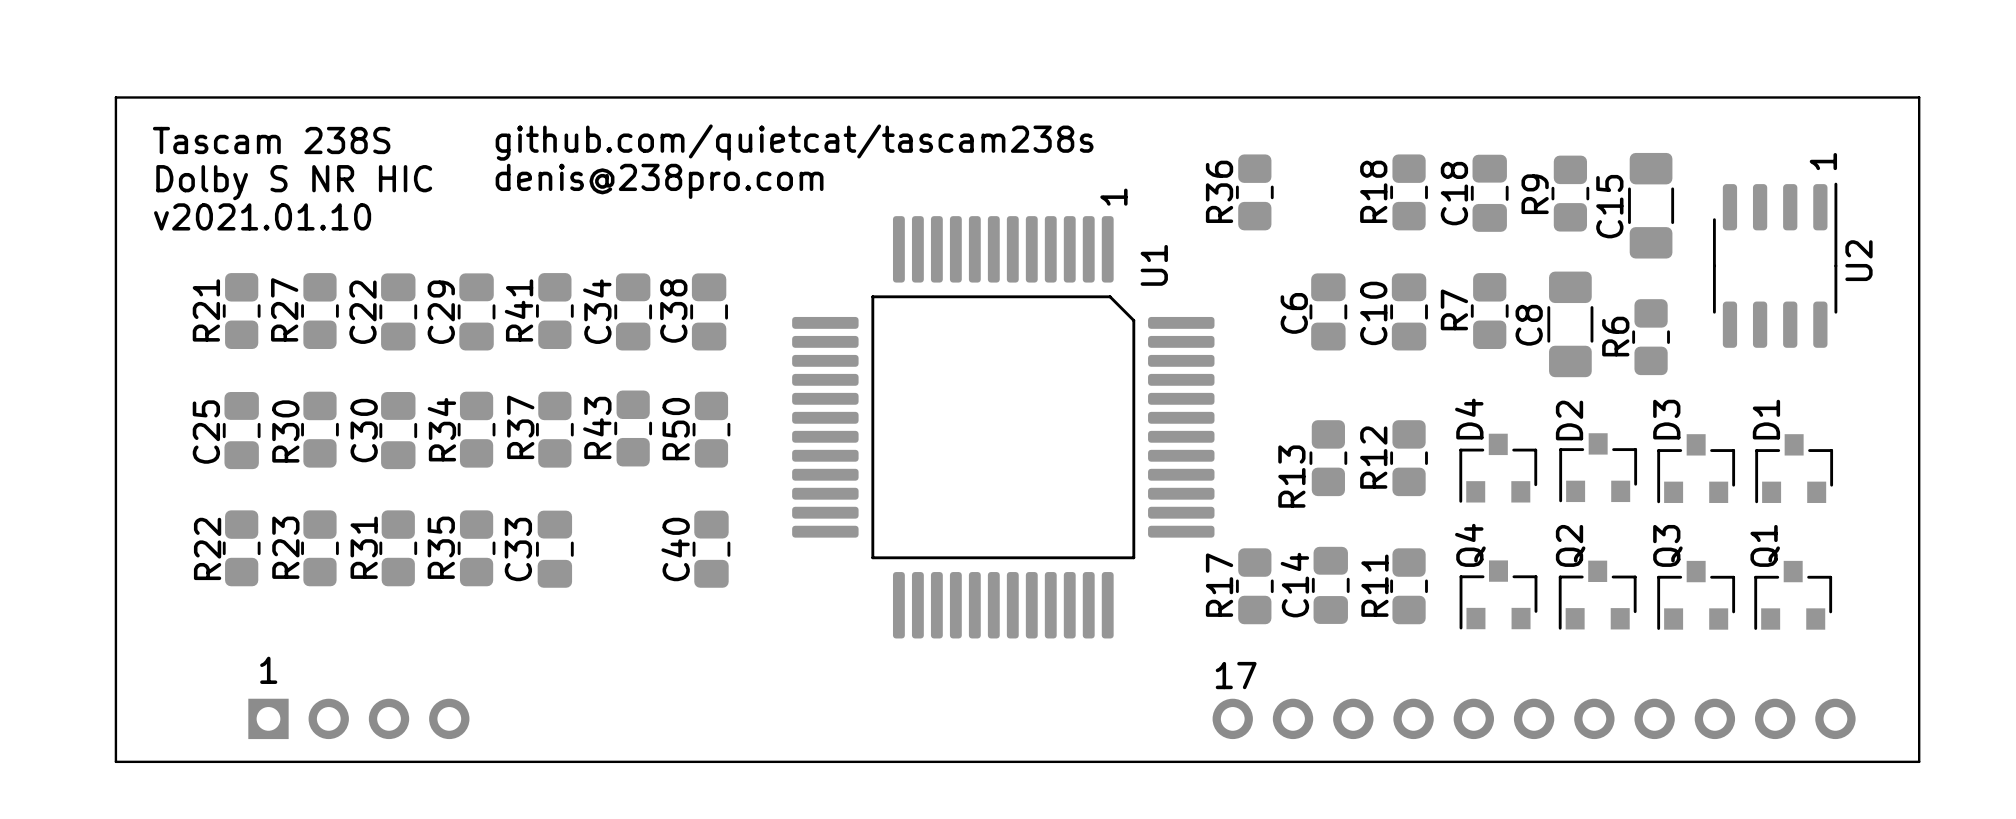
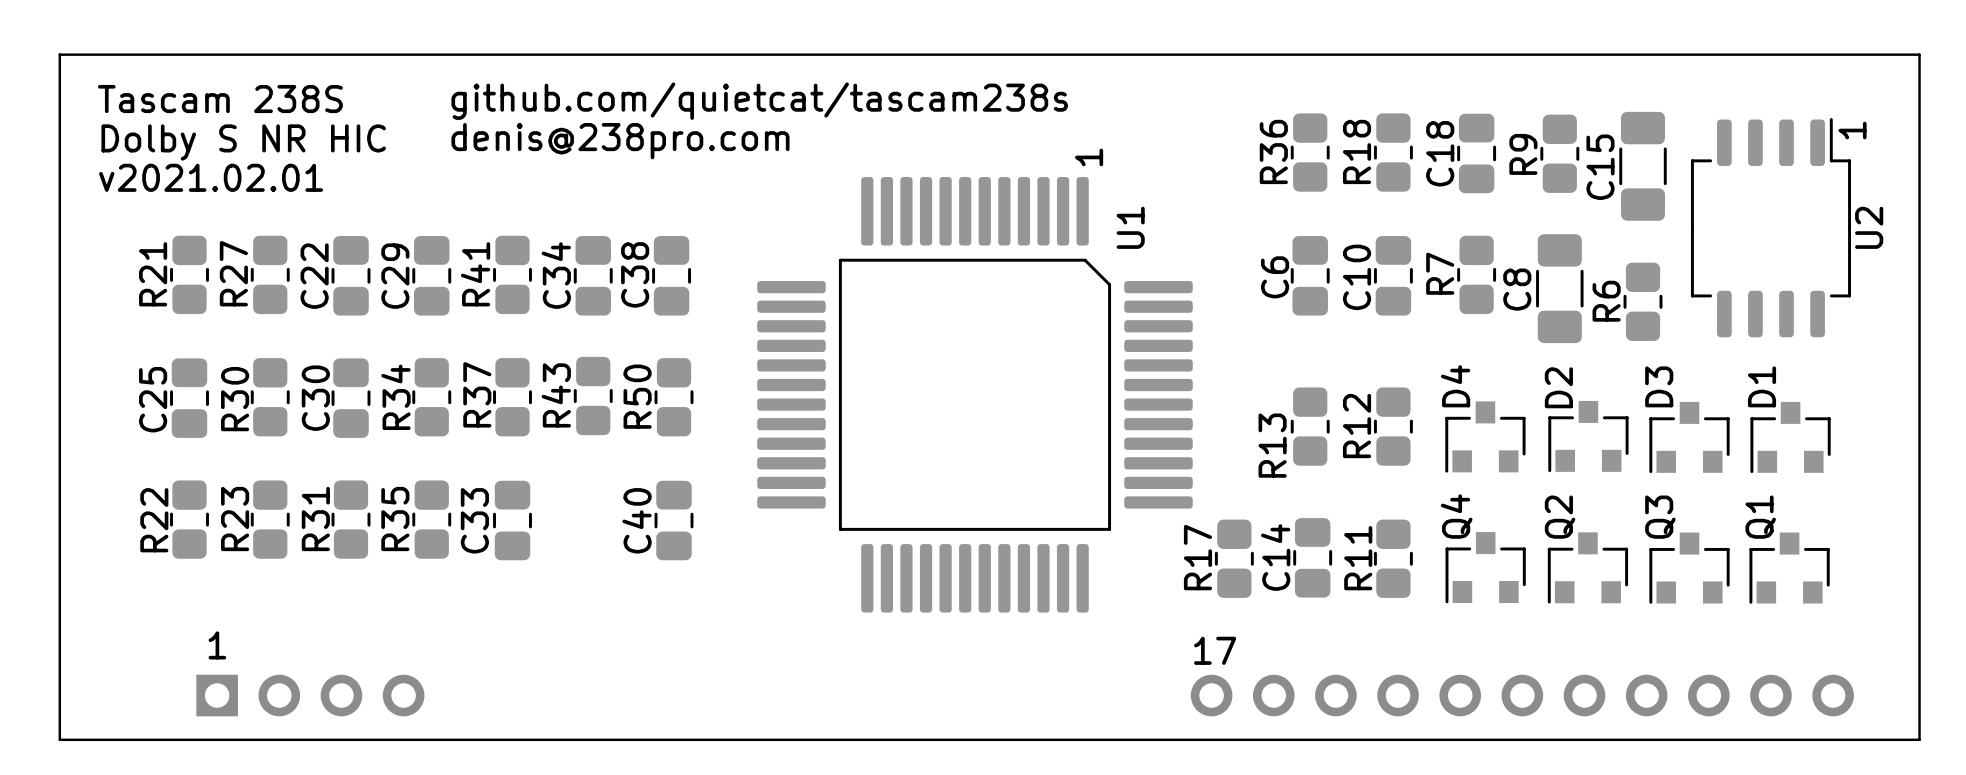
text position: 1 (1823, 161) -> 1 (1852, 130)
U2 footprint: [1712, 182, 1838, 348] -> [1690, 118, 1852, 338]
R36 position: (1254, 192) -> (1310, 152)
text: v2021.01.10 (262, 216) -> v2021.02.01 (211, 177)

